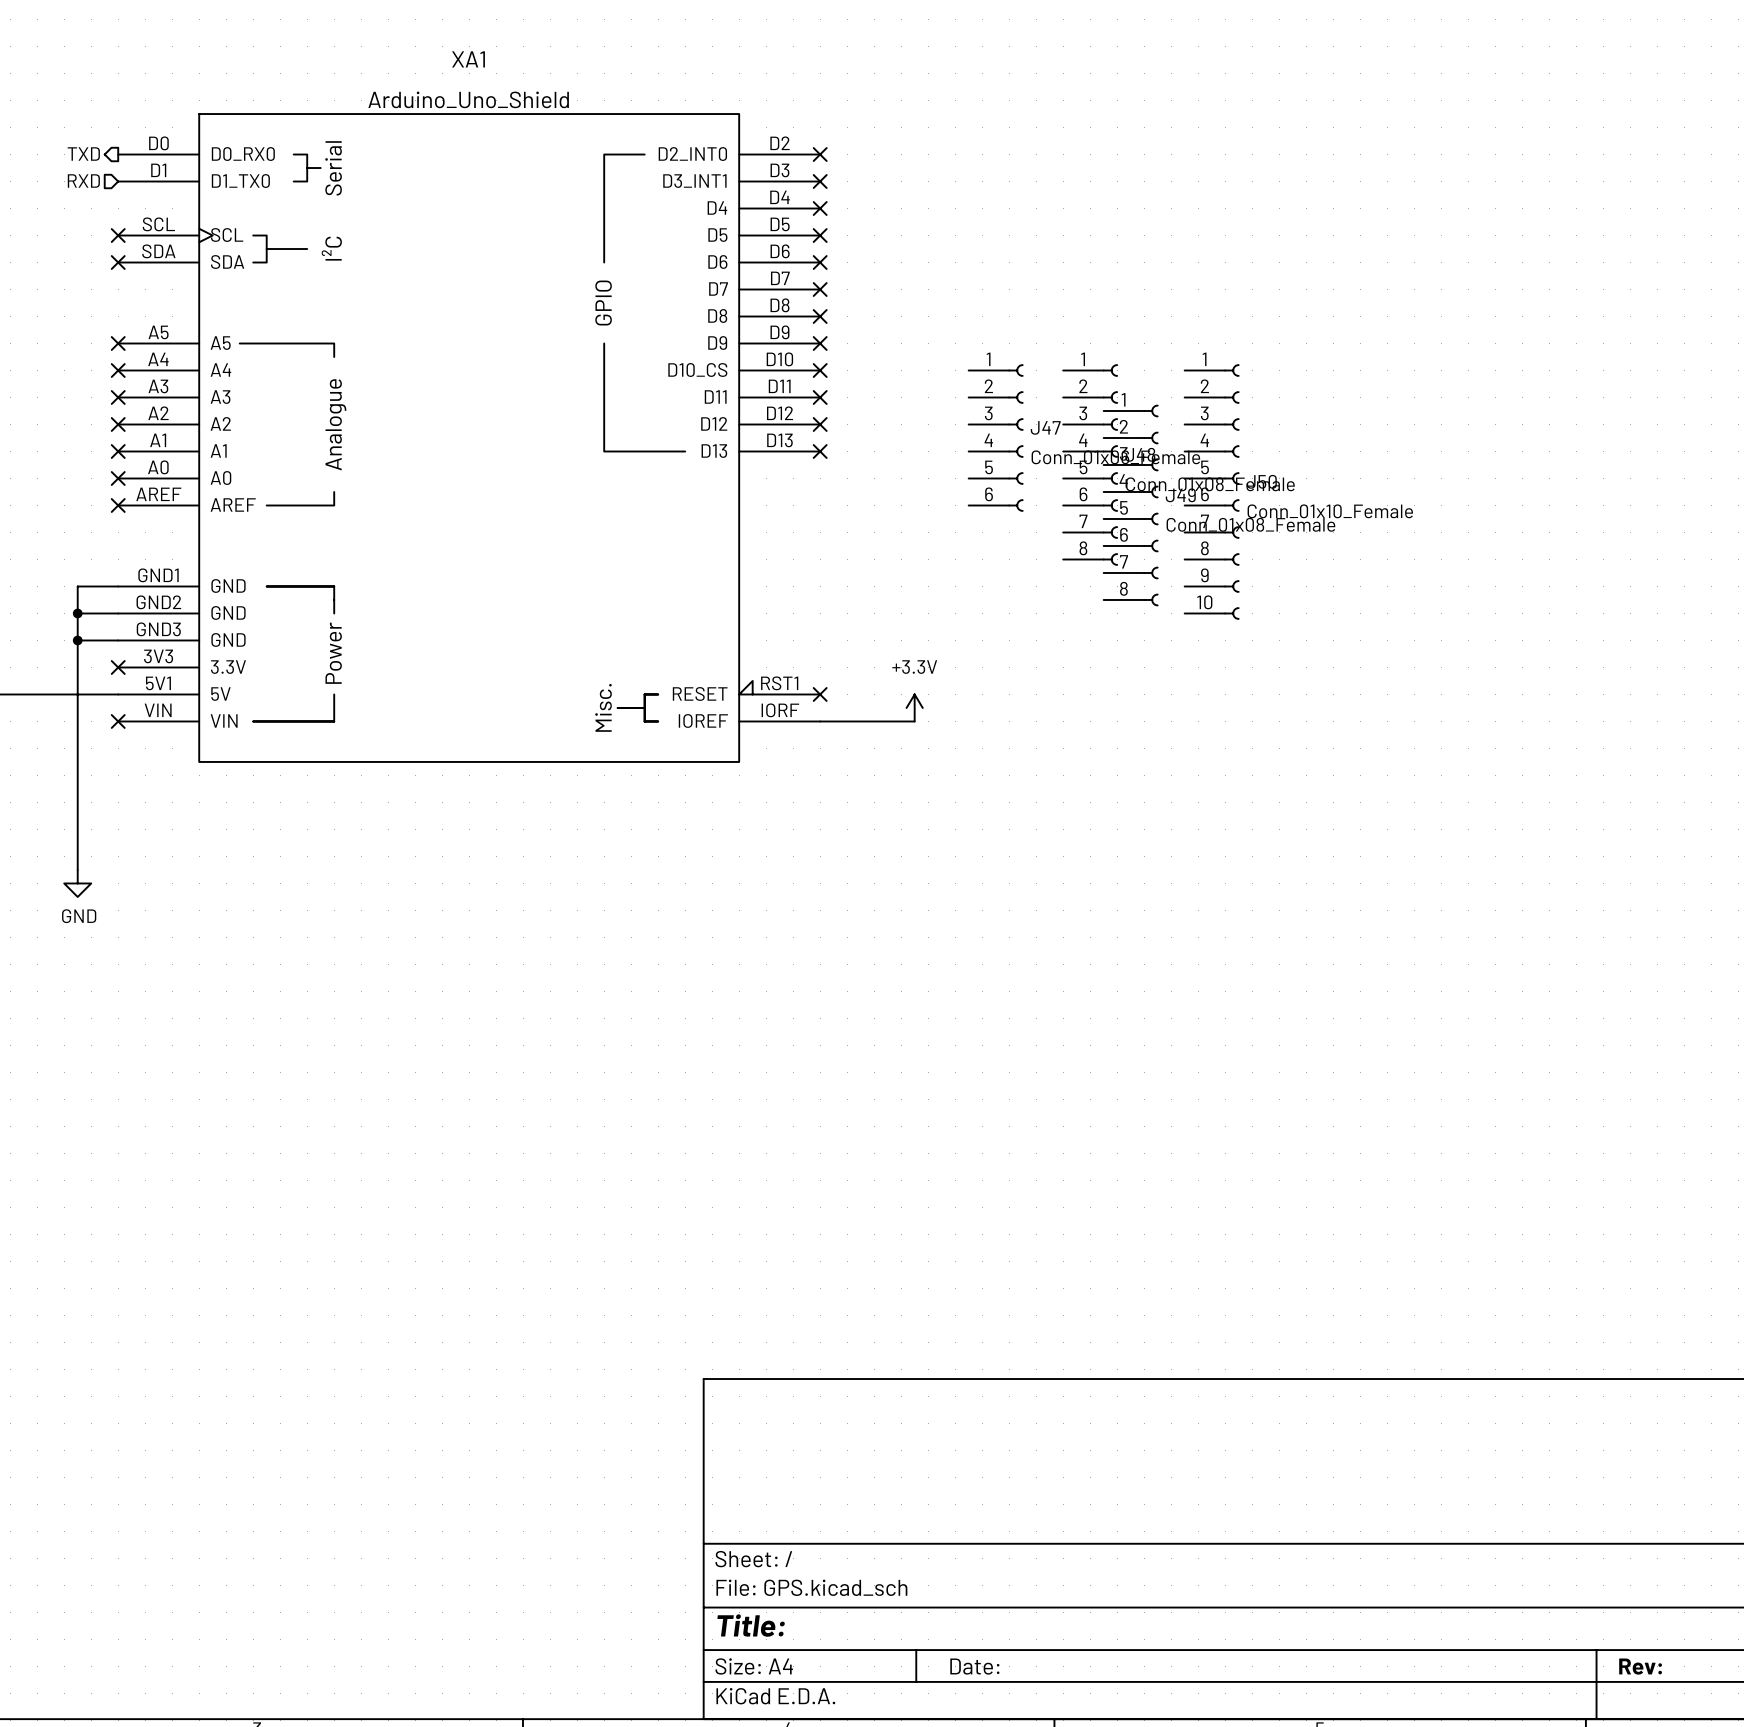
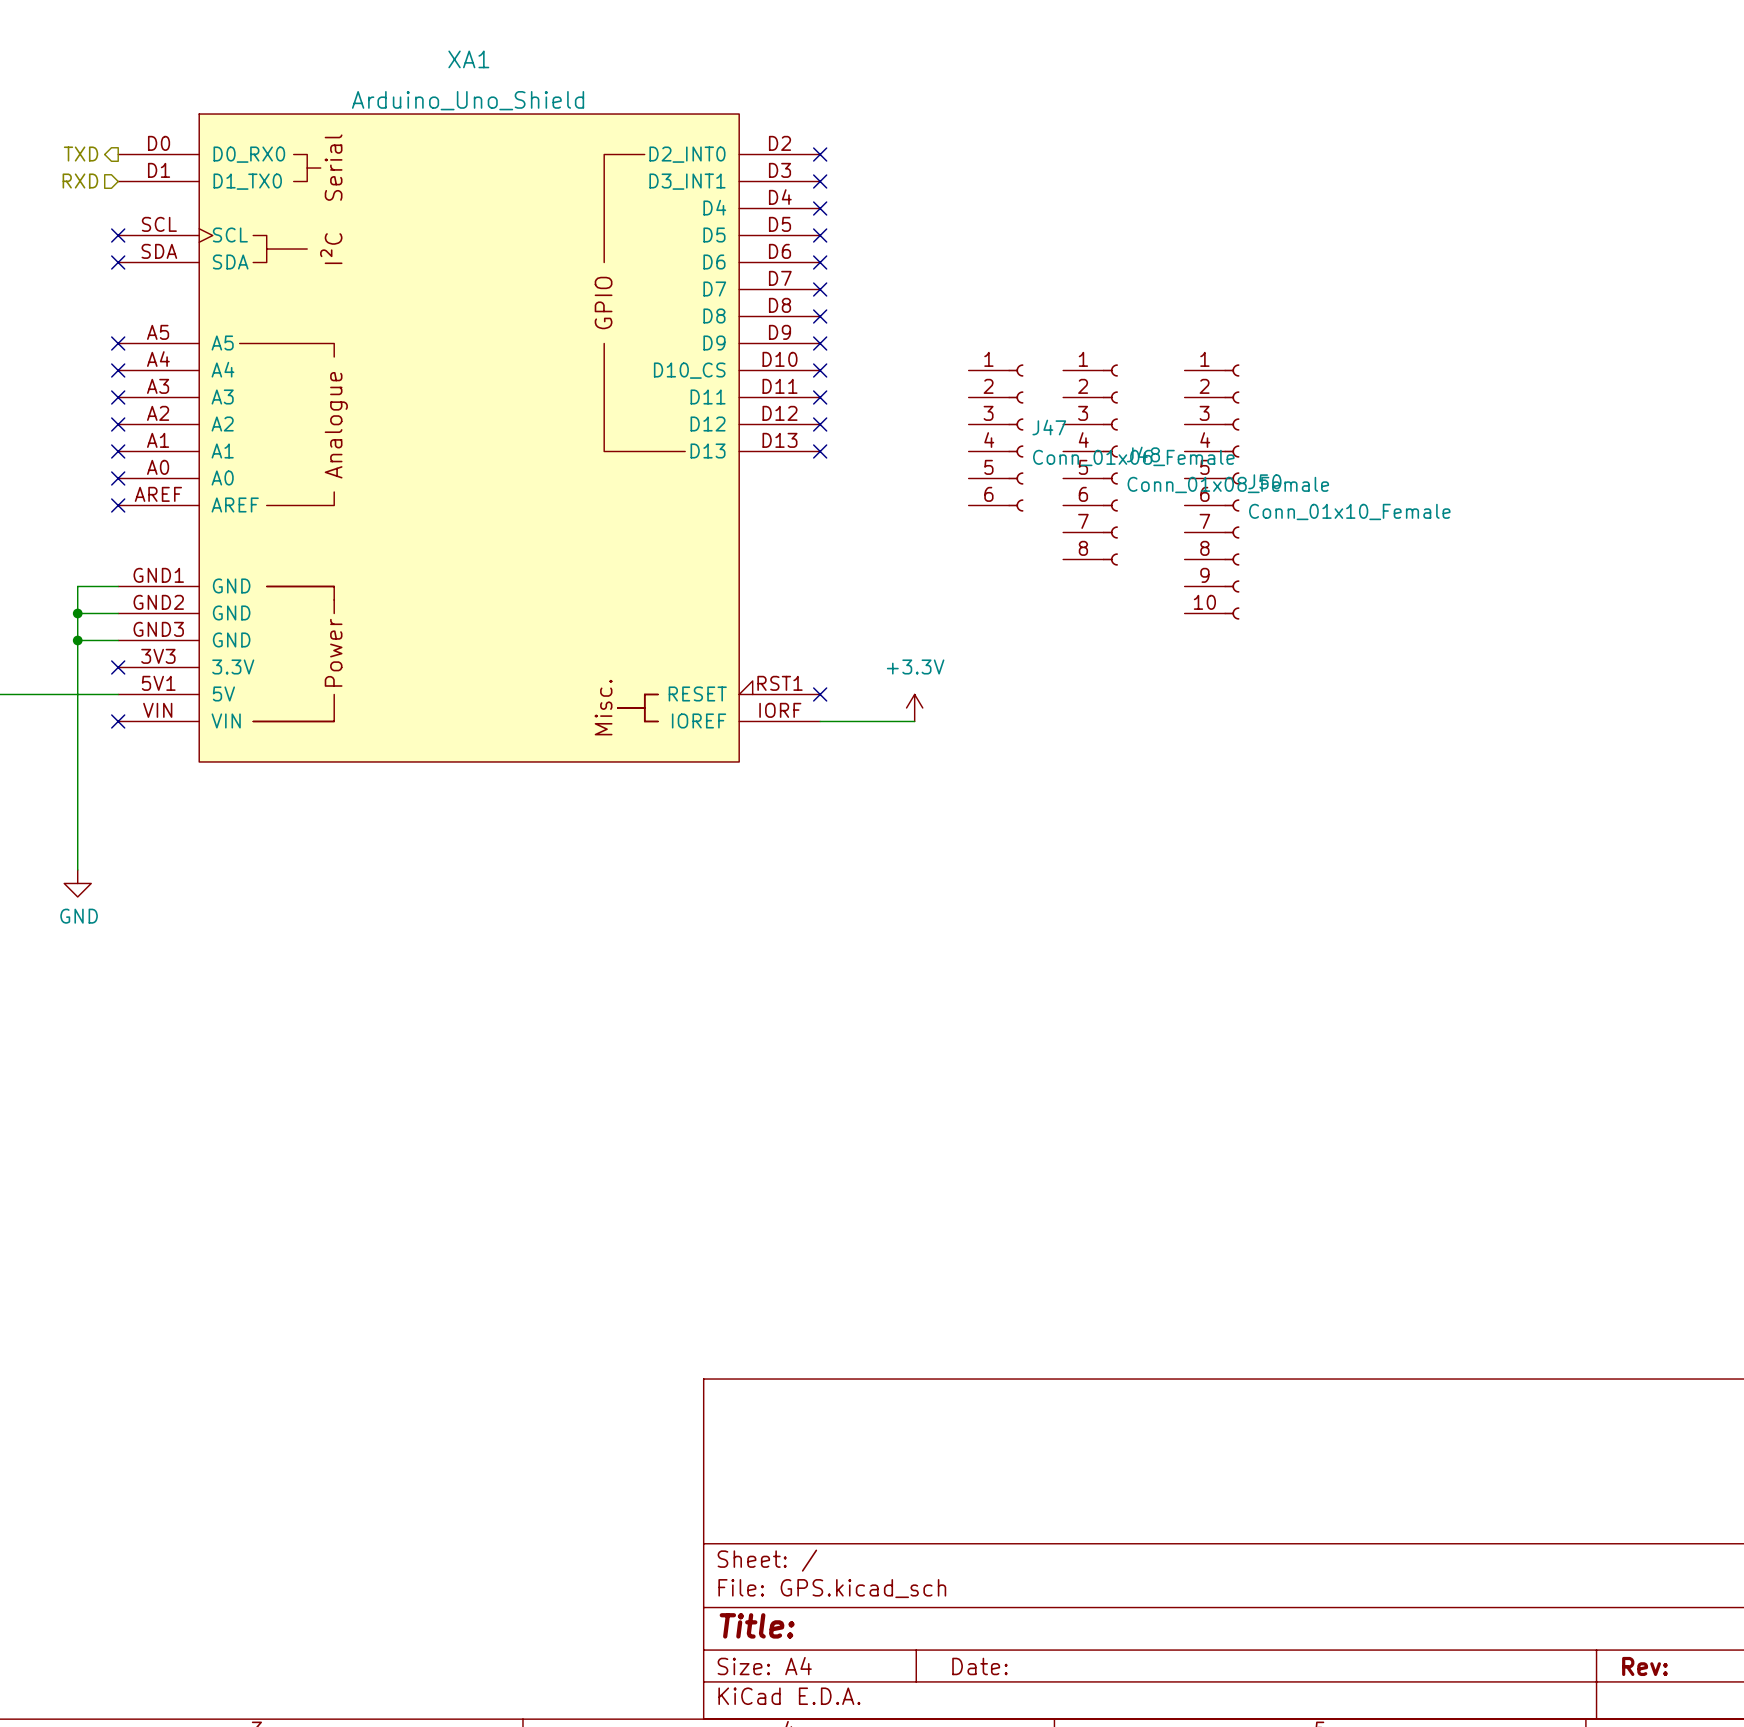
J49: Conn_01x08_Female (1131, 505) -> none

